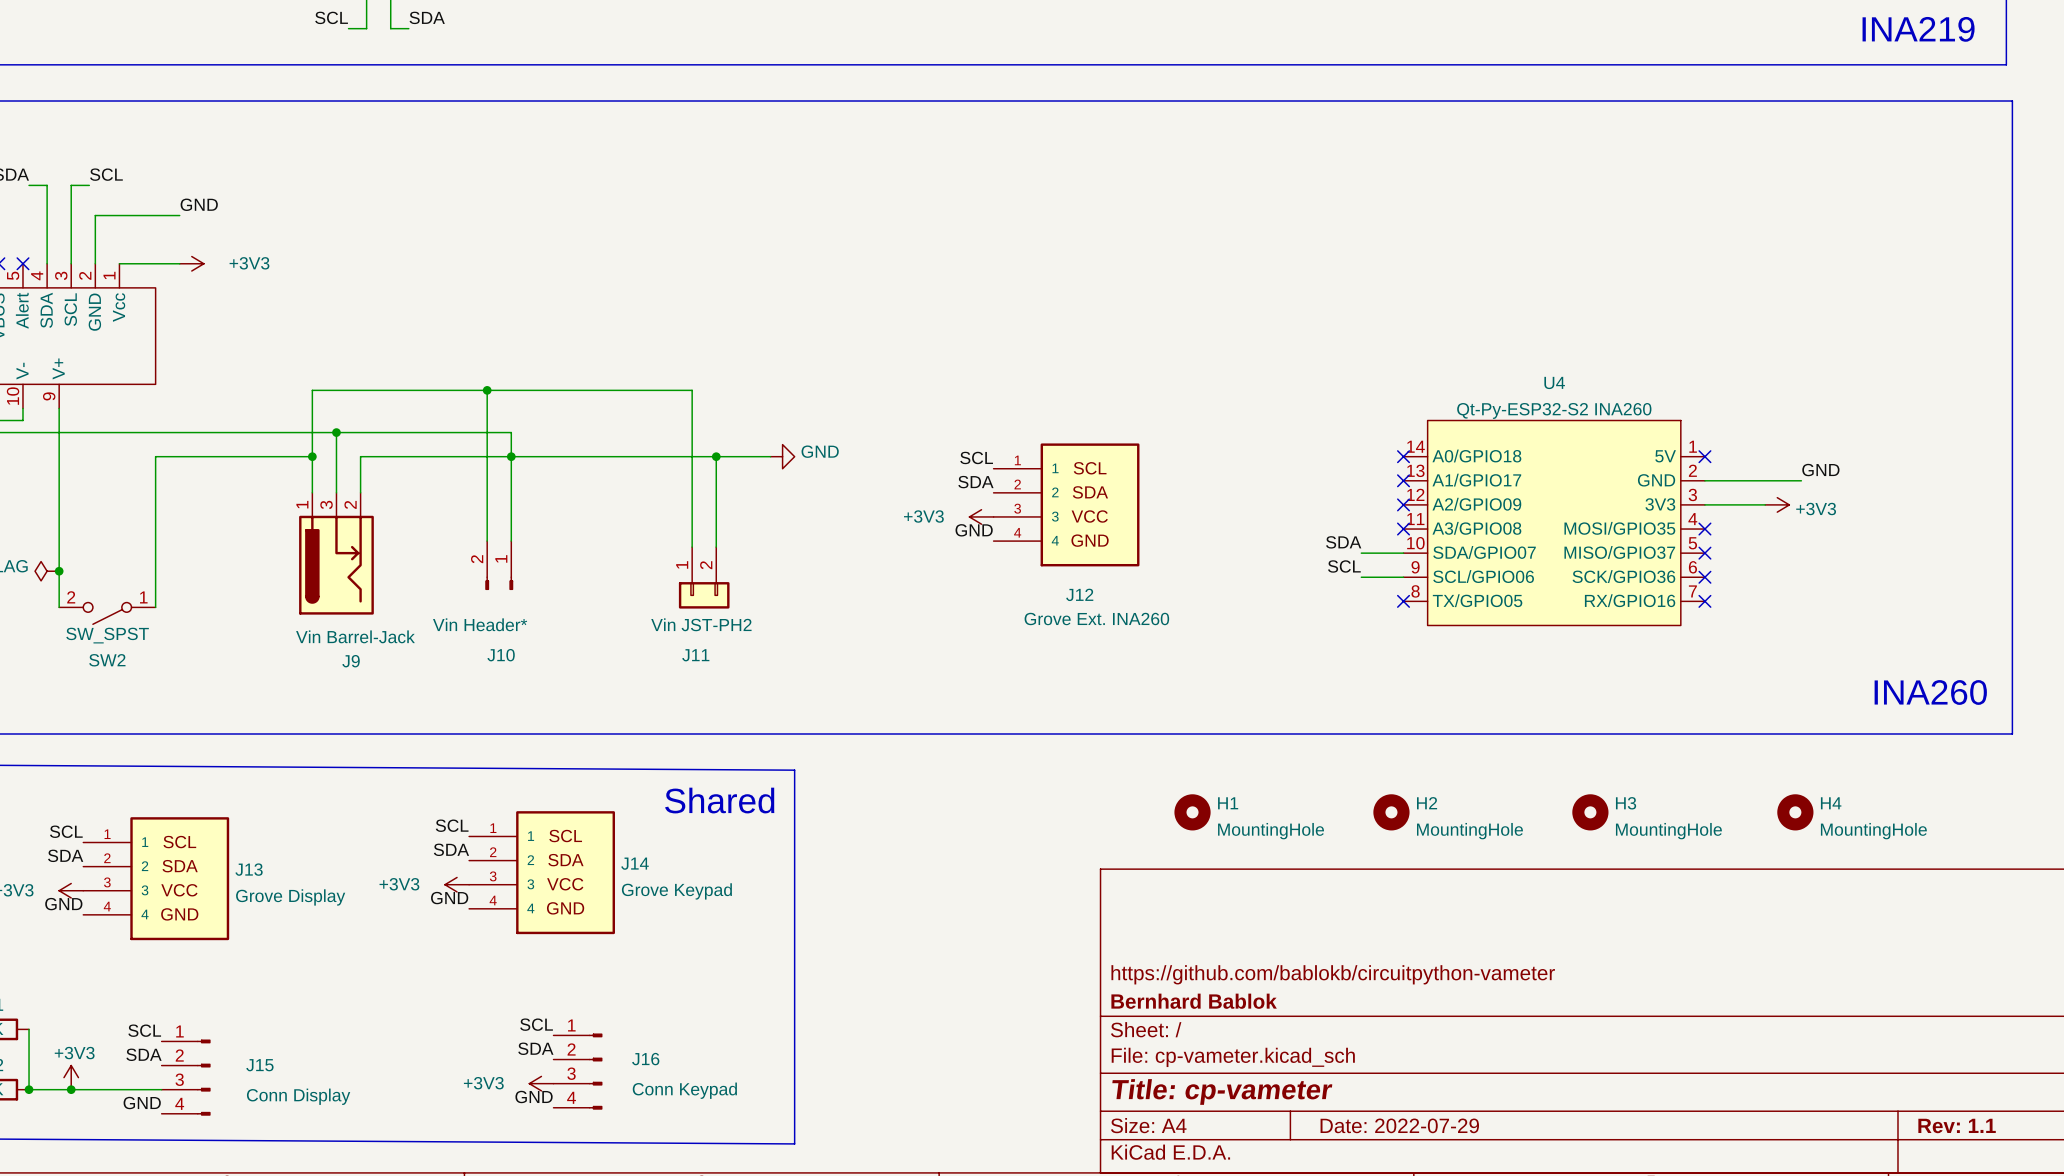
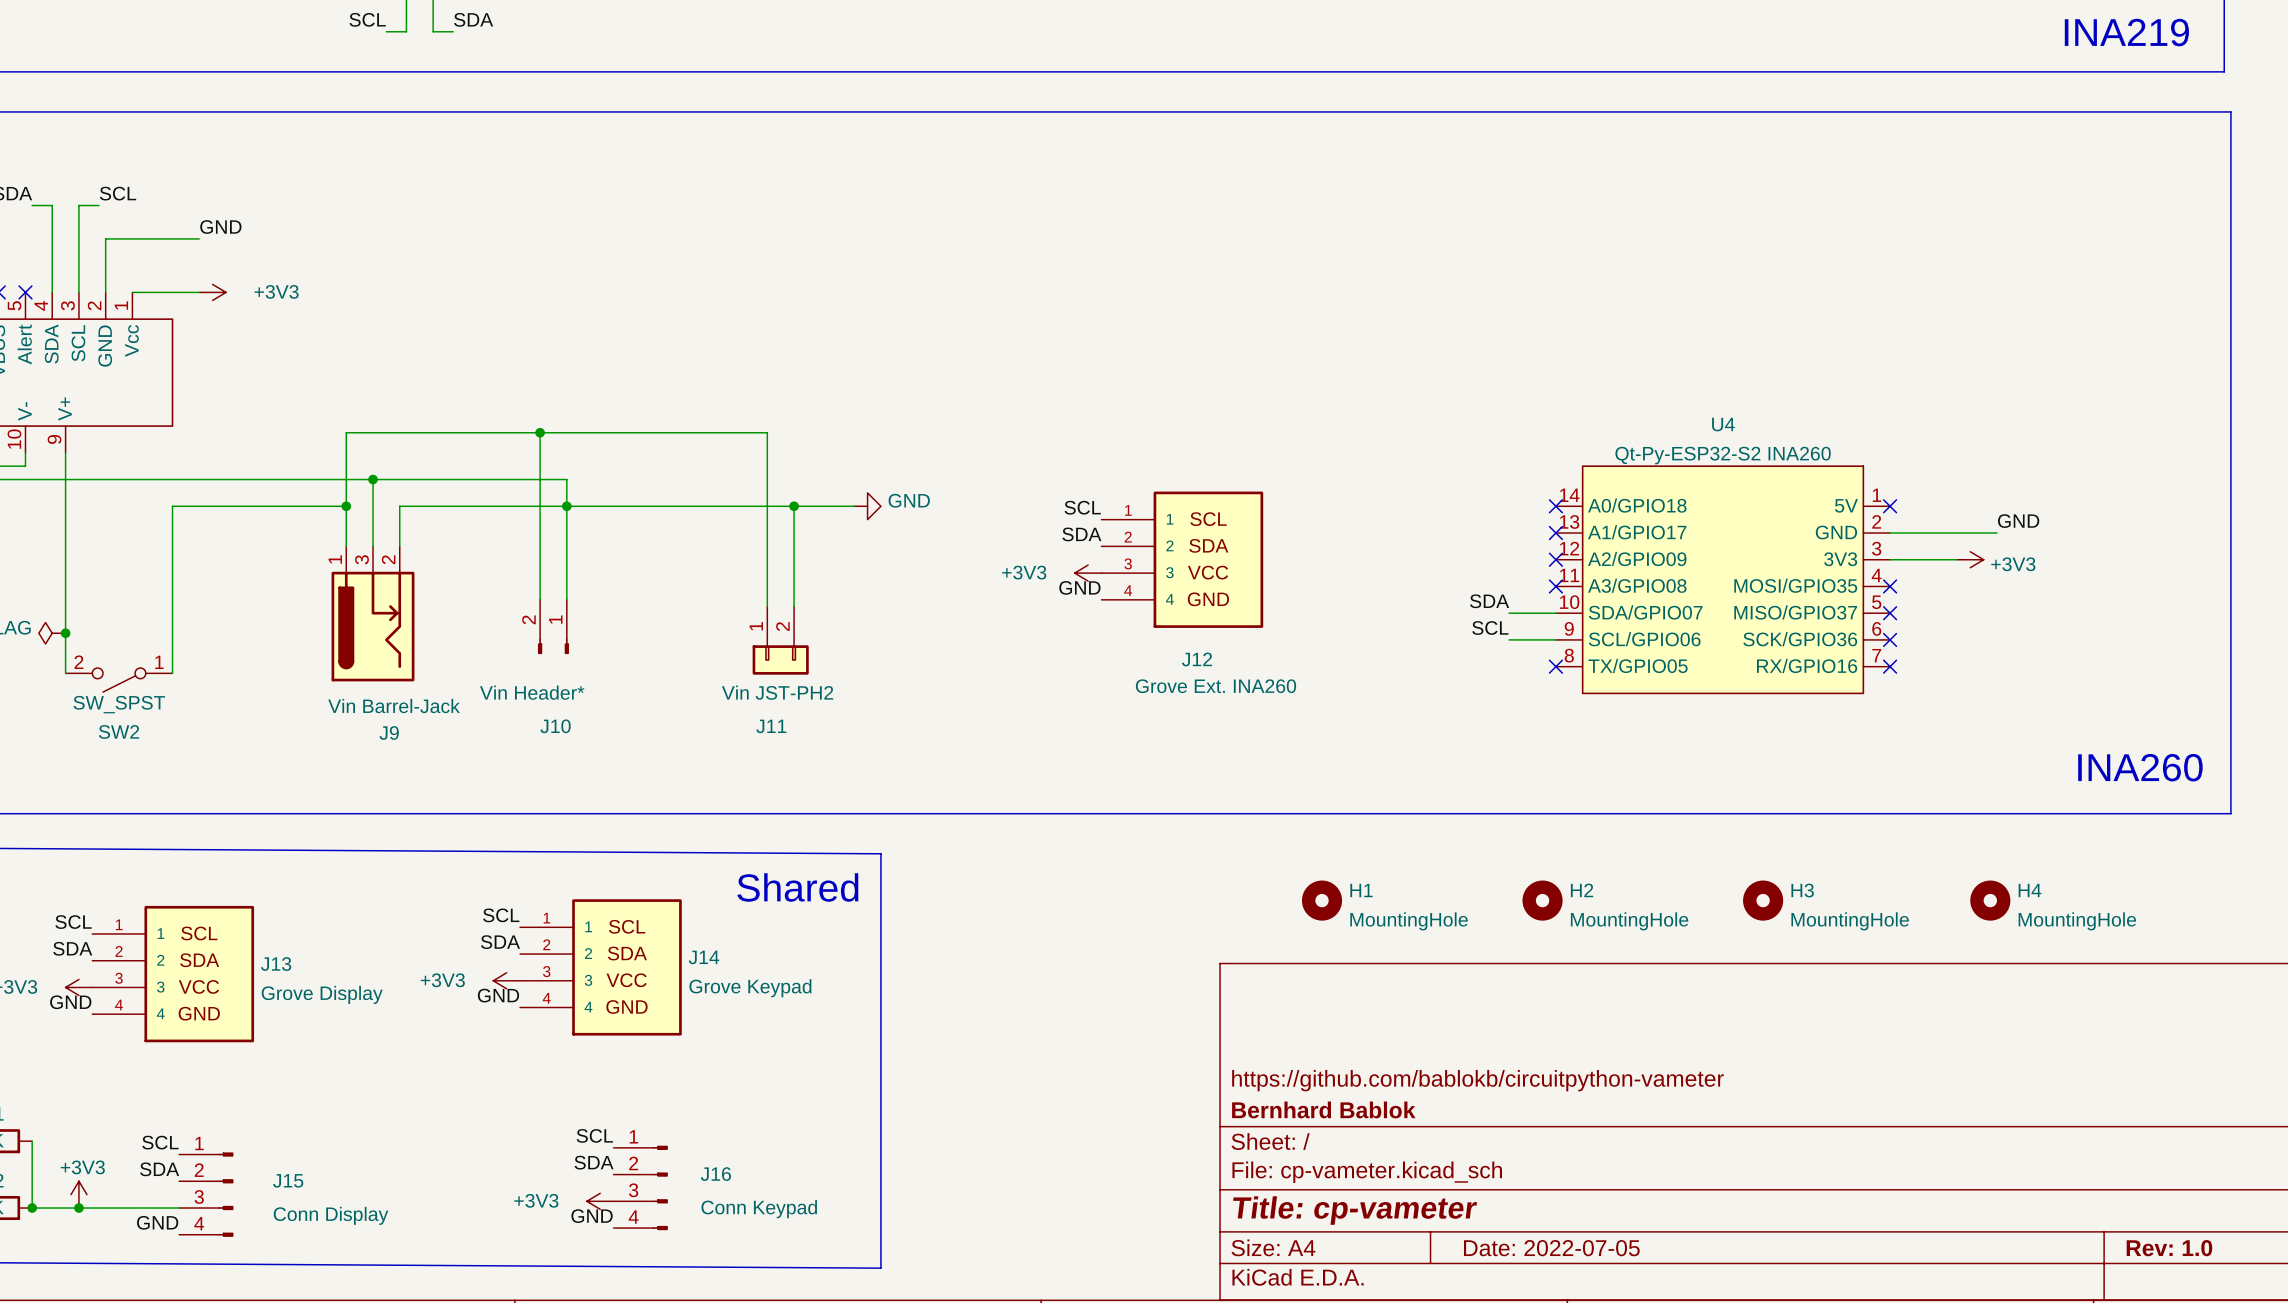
title block: Date: 2022-07-29 (1399, 1125) -> Date: 2022-07-05 (1551, 1248)
title block: Rev: 1.1 (1957, 1125) -> Rev: 1.0 (2169, 1248)

